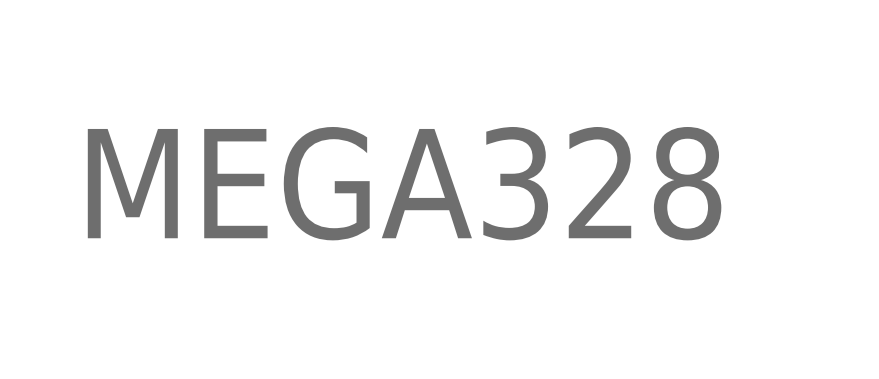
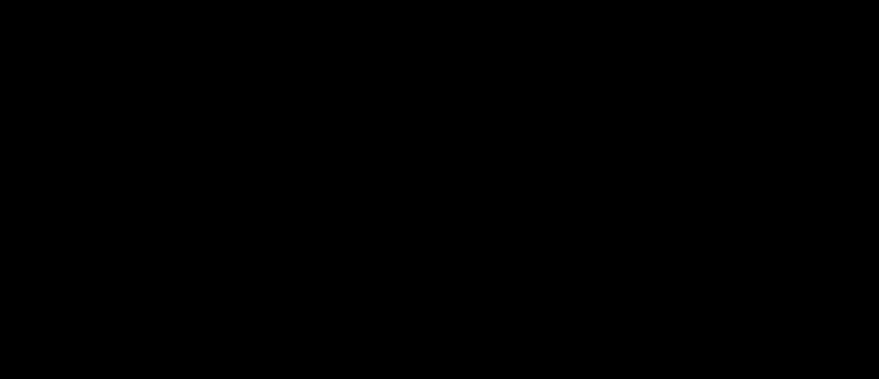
text: MEGA328 (404, 183) -> none

